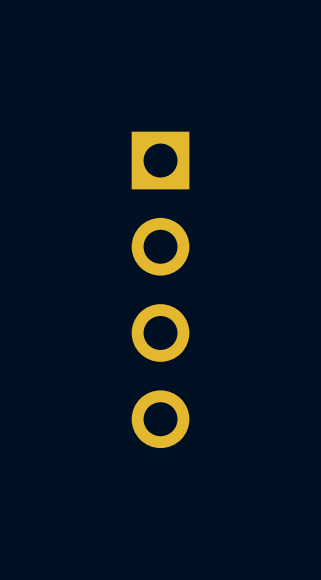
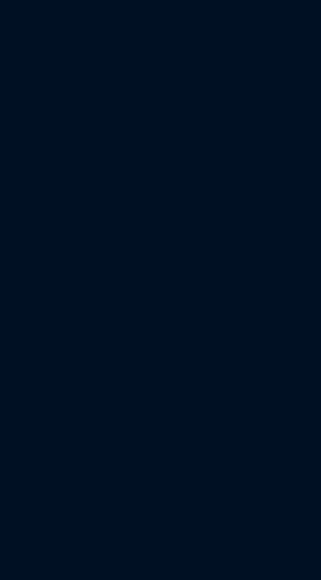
part: (160, 289) -> none

